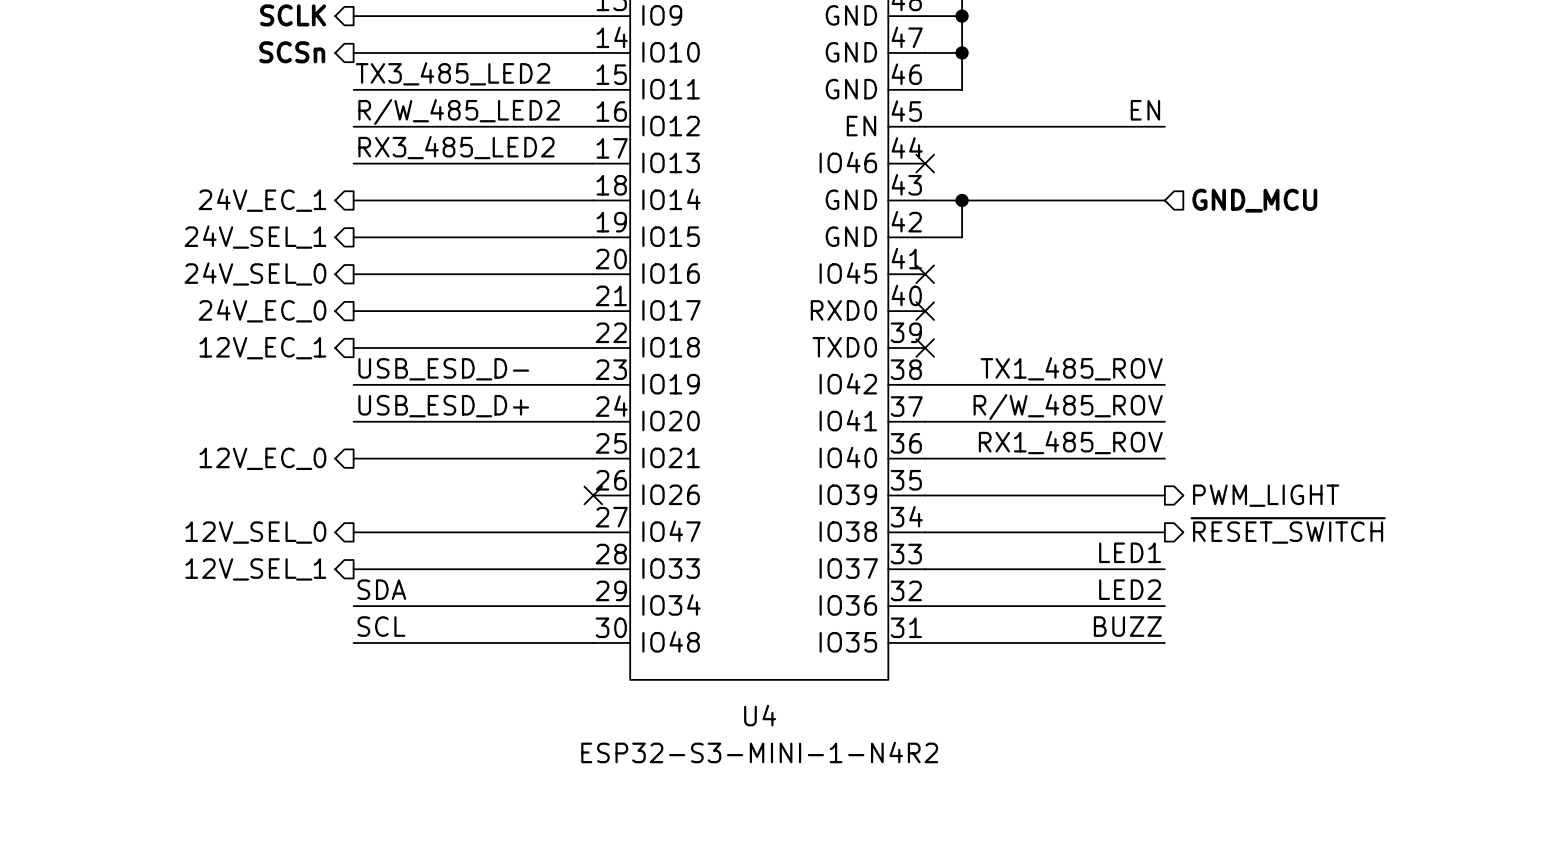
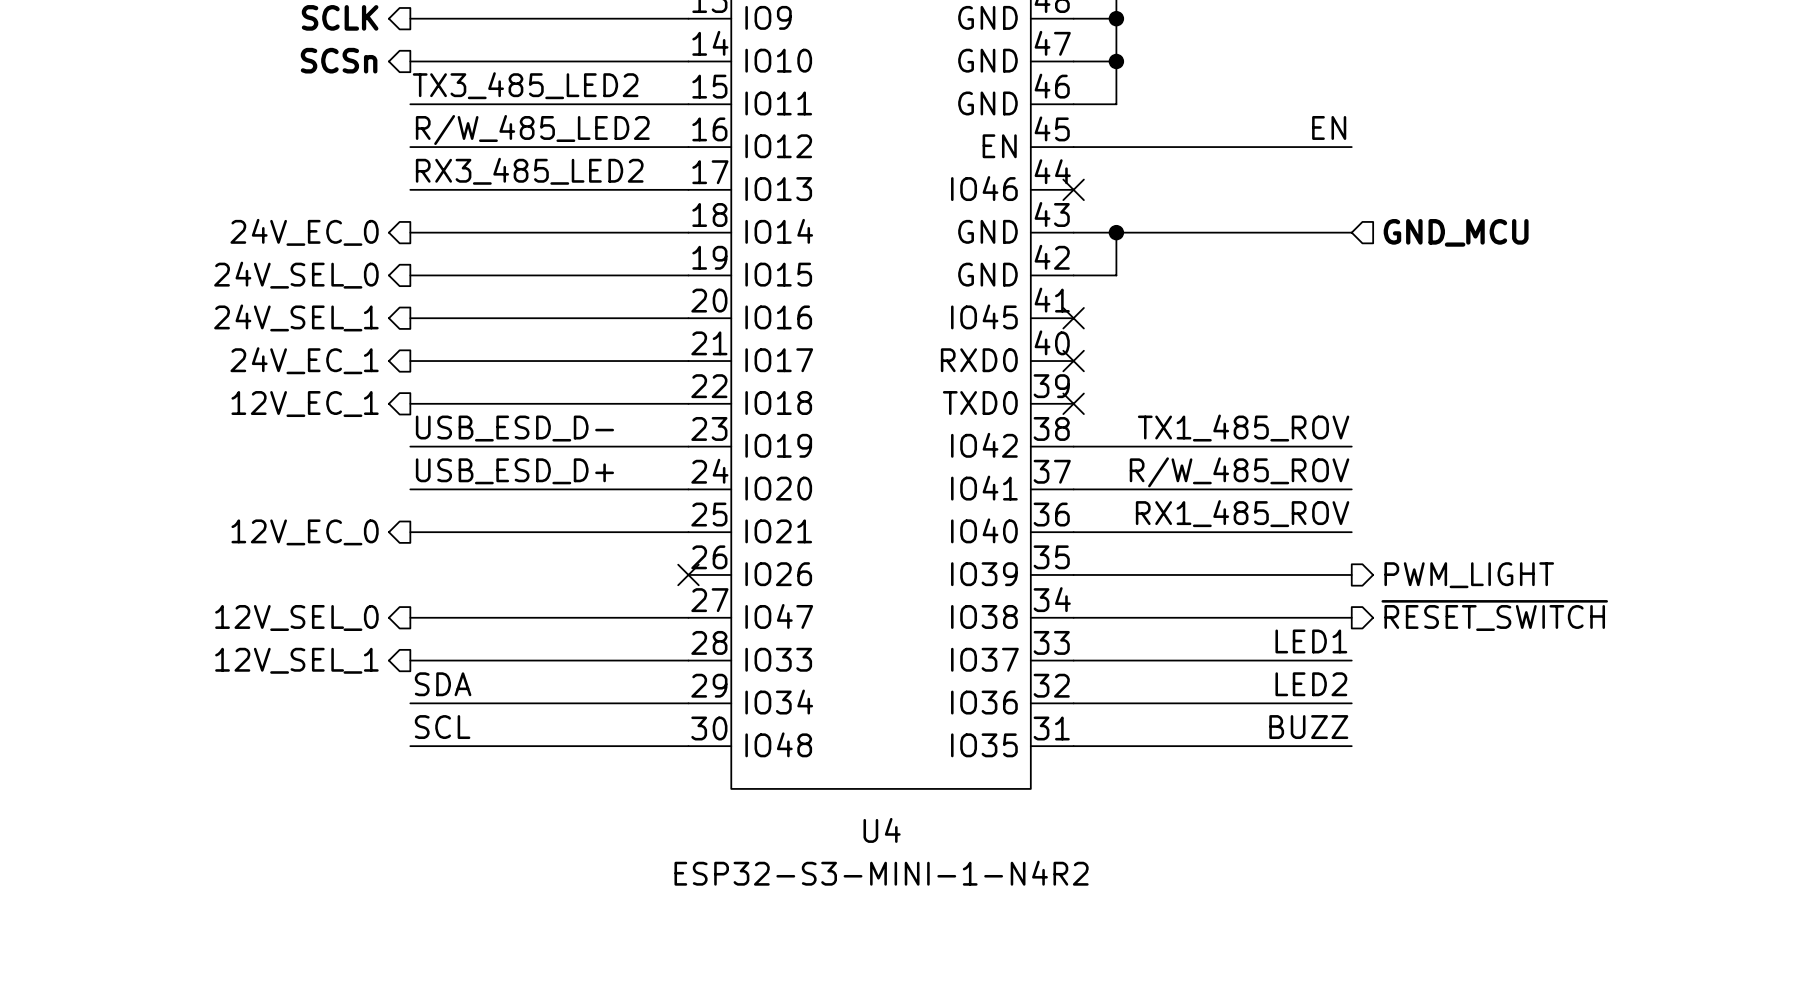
hierarchical label: 24V_EC_1 (262, 200) -> 24V_EC_0 (304, 232)
hierarchical label: 24V_SEL_1 (255, 237) -> 24V_SEL_0 (296, 275)
hierarchical label: 24V_SEL_0 (255, 273) -> 24V_SEL_1 (296, 317)
hierarchical label: 24V_EC_0 (262, 310) -> 24V_EC_1 (304, 360)

